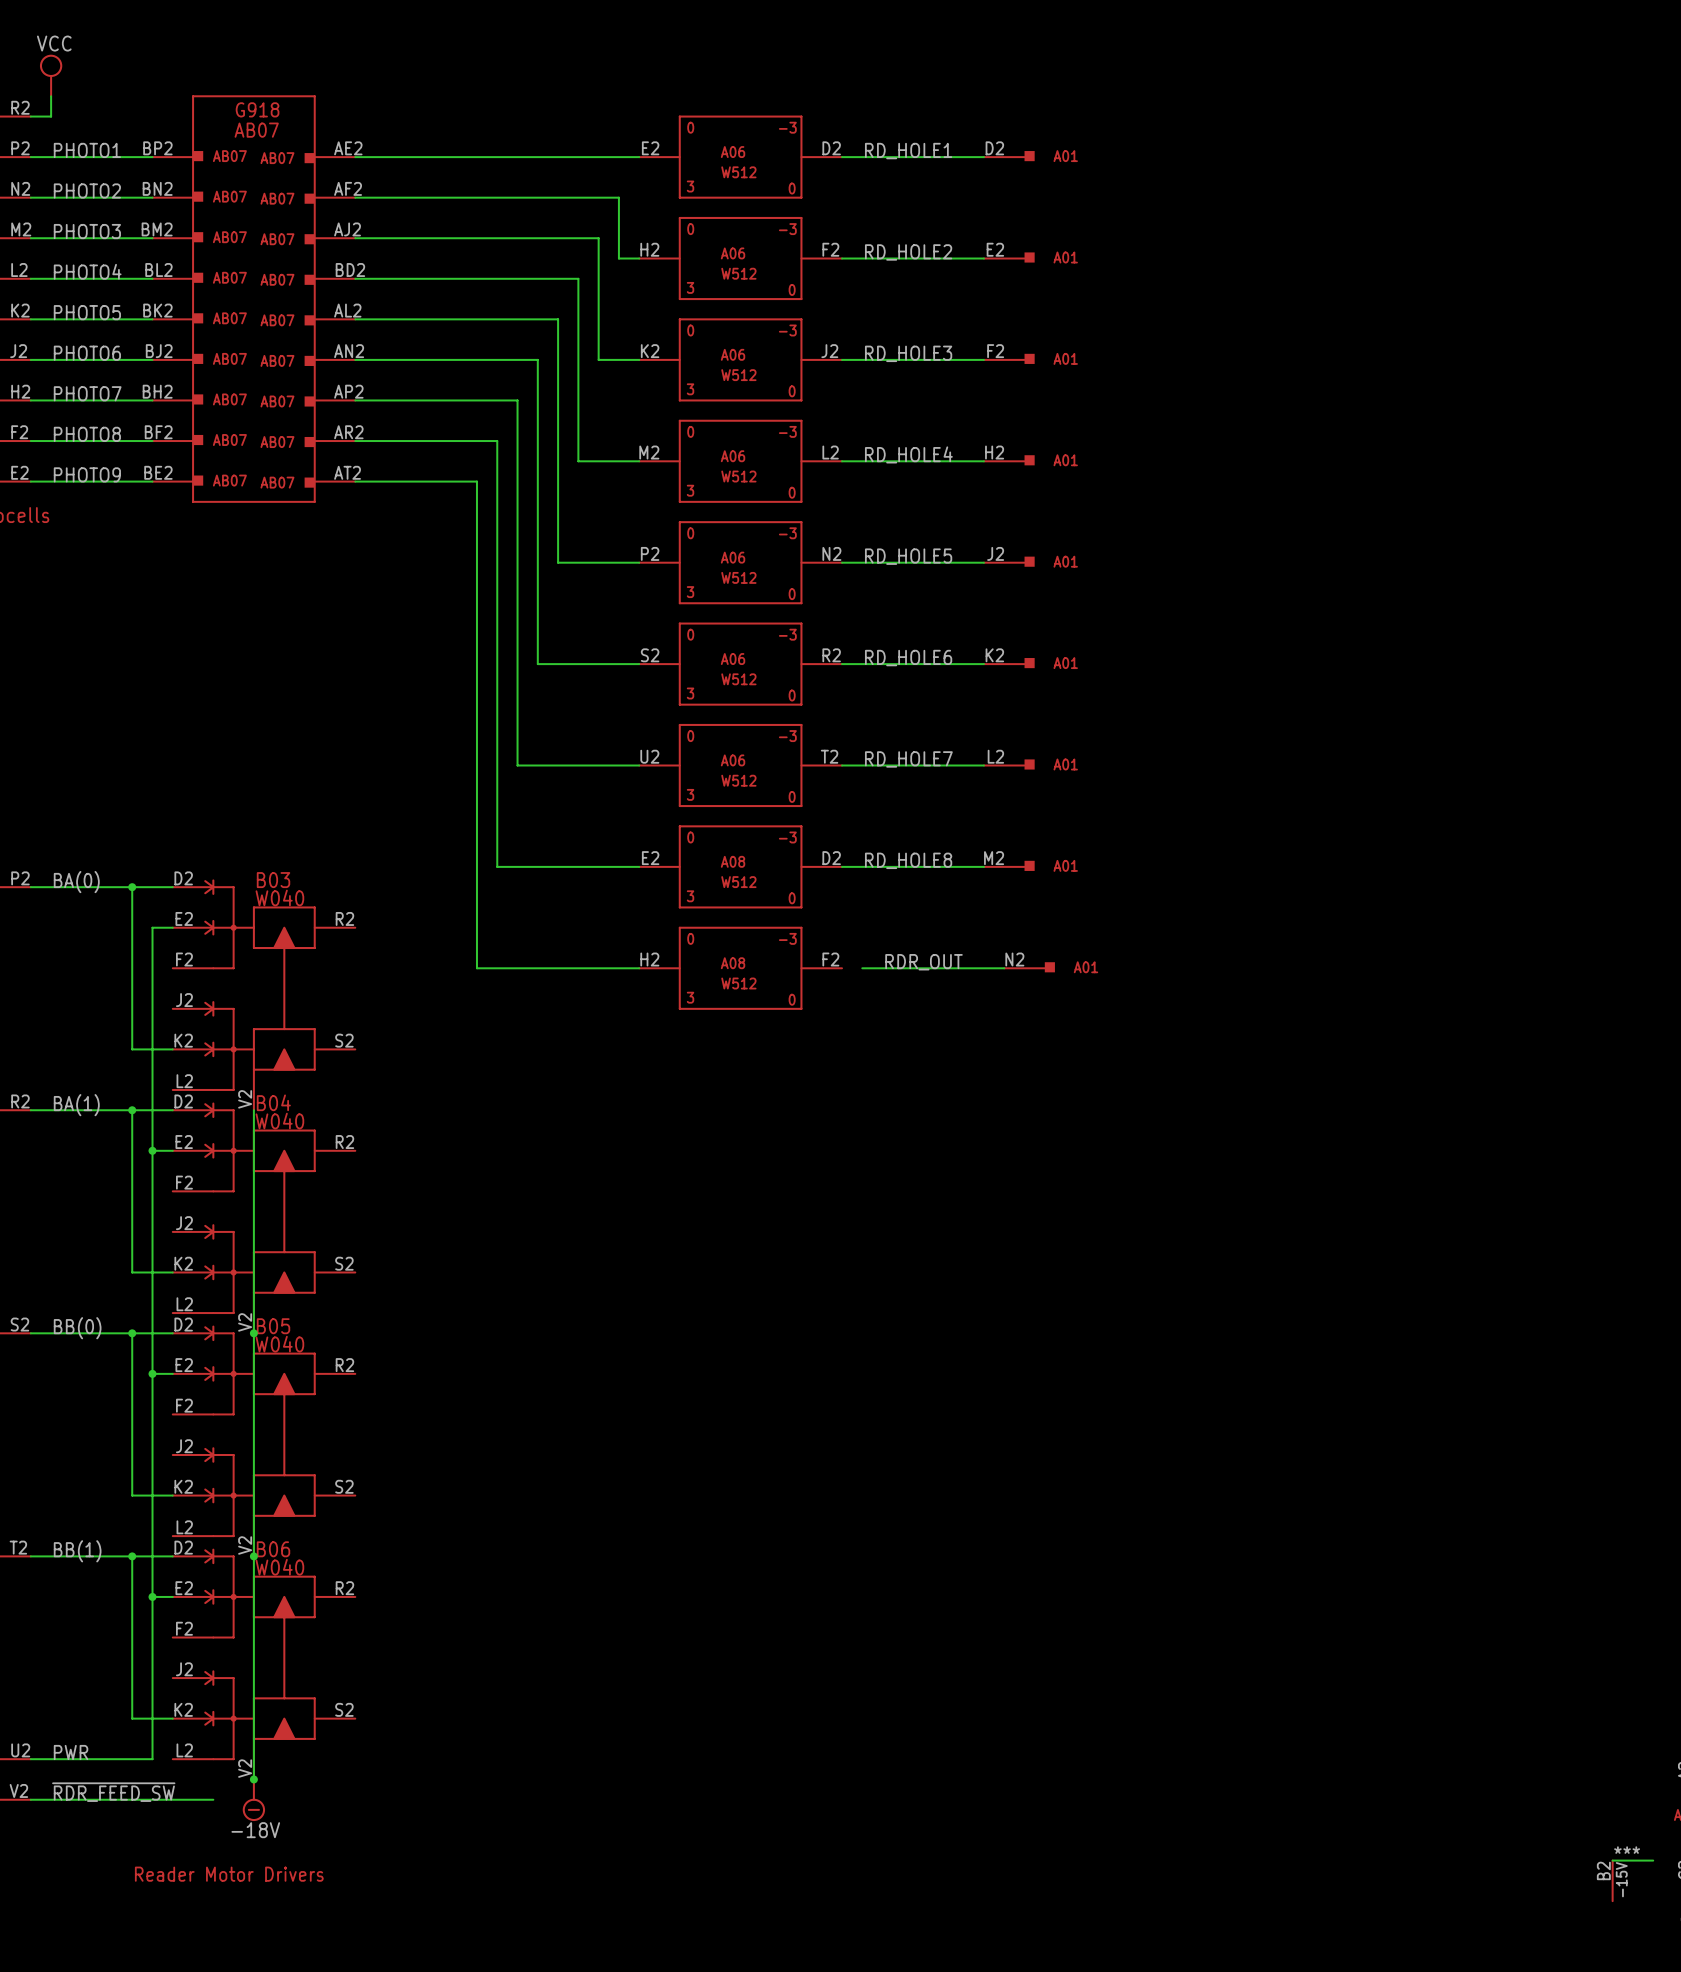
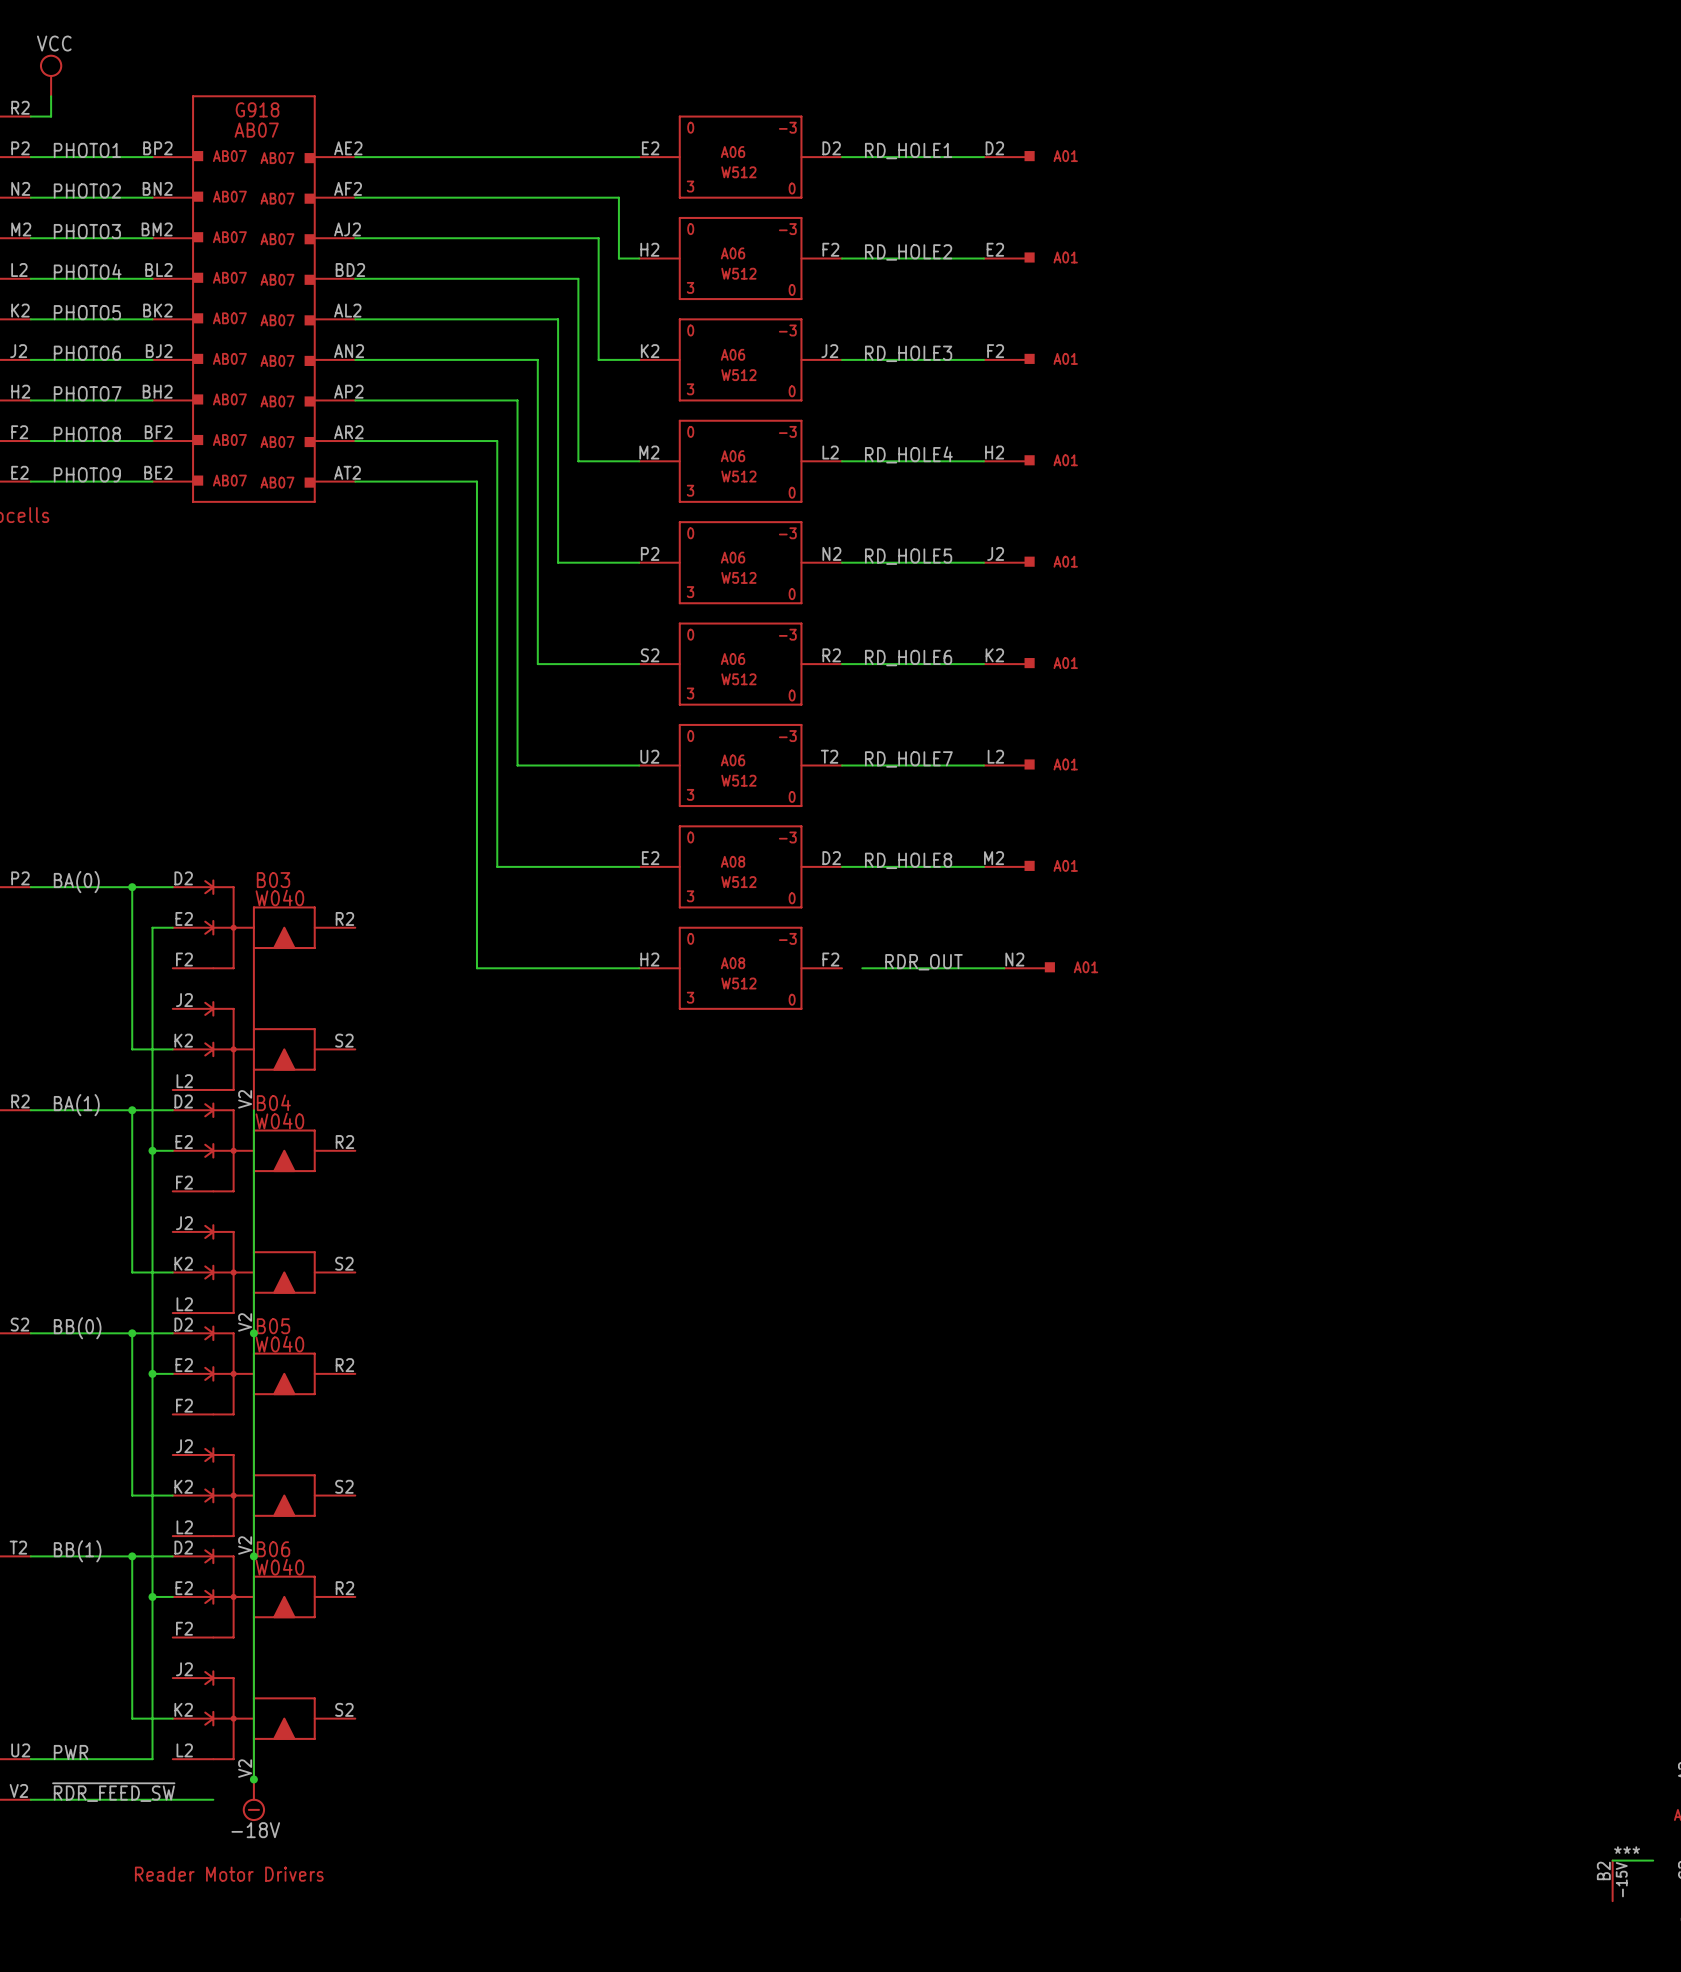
B03 symbol: [172, 879, 356, 1111] -> [172, 879, 356, 1111]
B04 symbol: [172, 1102, 356, 1334] -> [172, 1102, 356, 1334]
B05 symbol: [172, 1325, 356, 1557] -> [172, 1325, 356, 1557]
B06 symbol: [172, 1548, 356, 1780] -> [172, 1548, 356, 1780]

